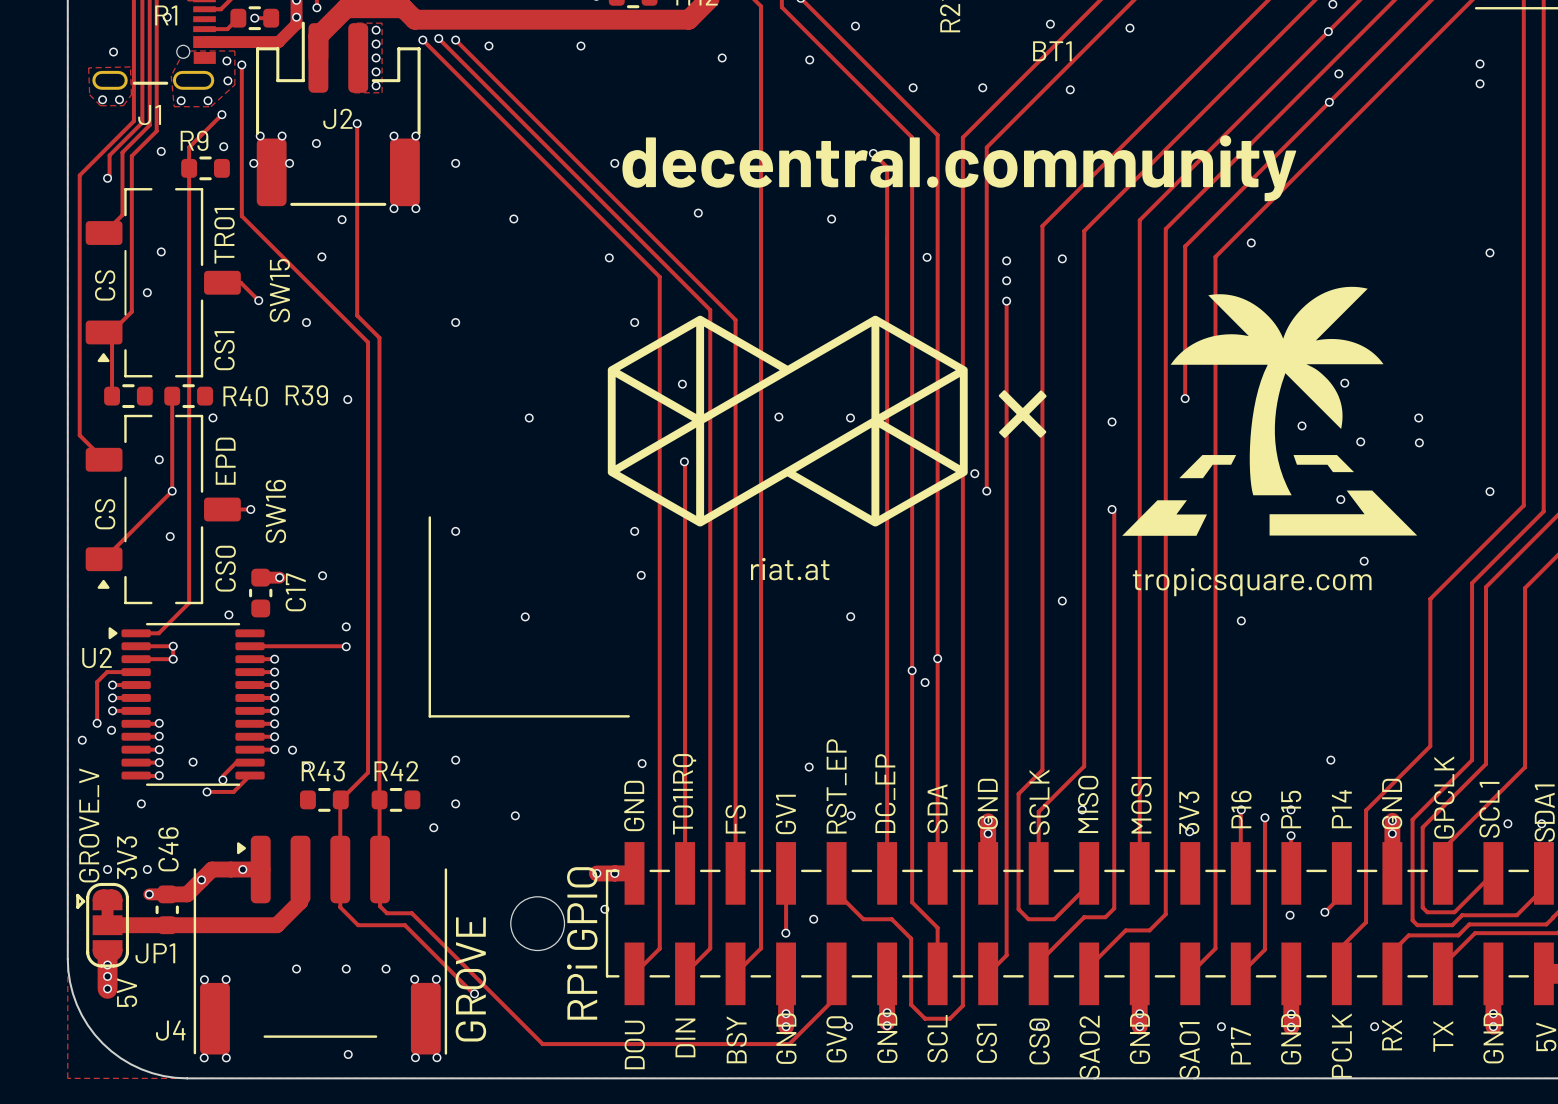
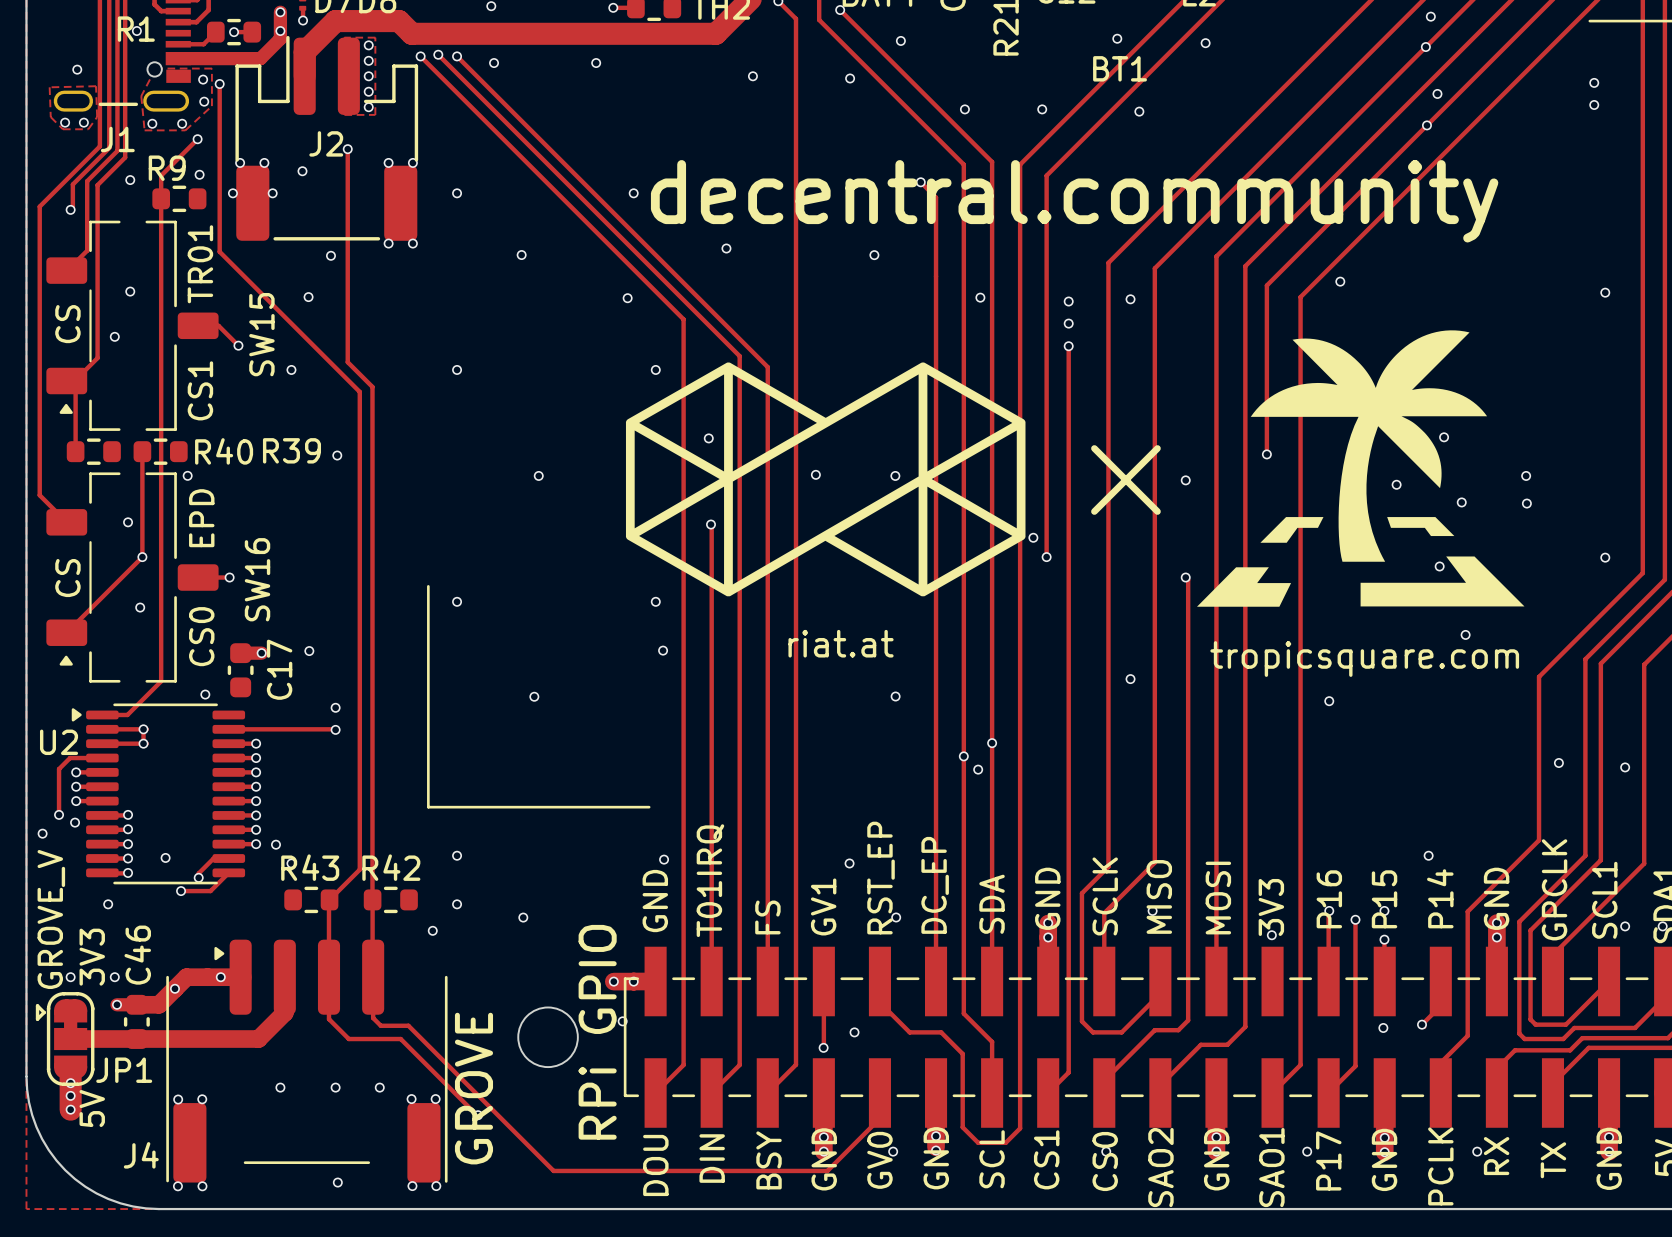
via: none -> (1558, 763)
via: none -> (1625, 767)

